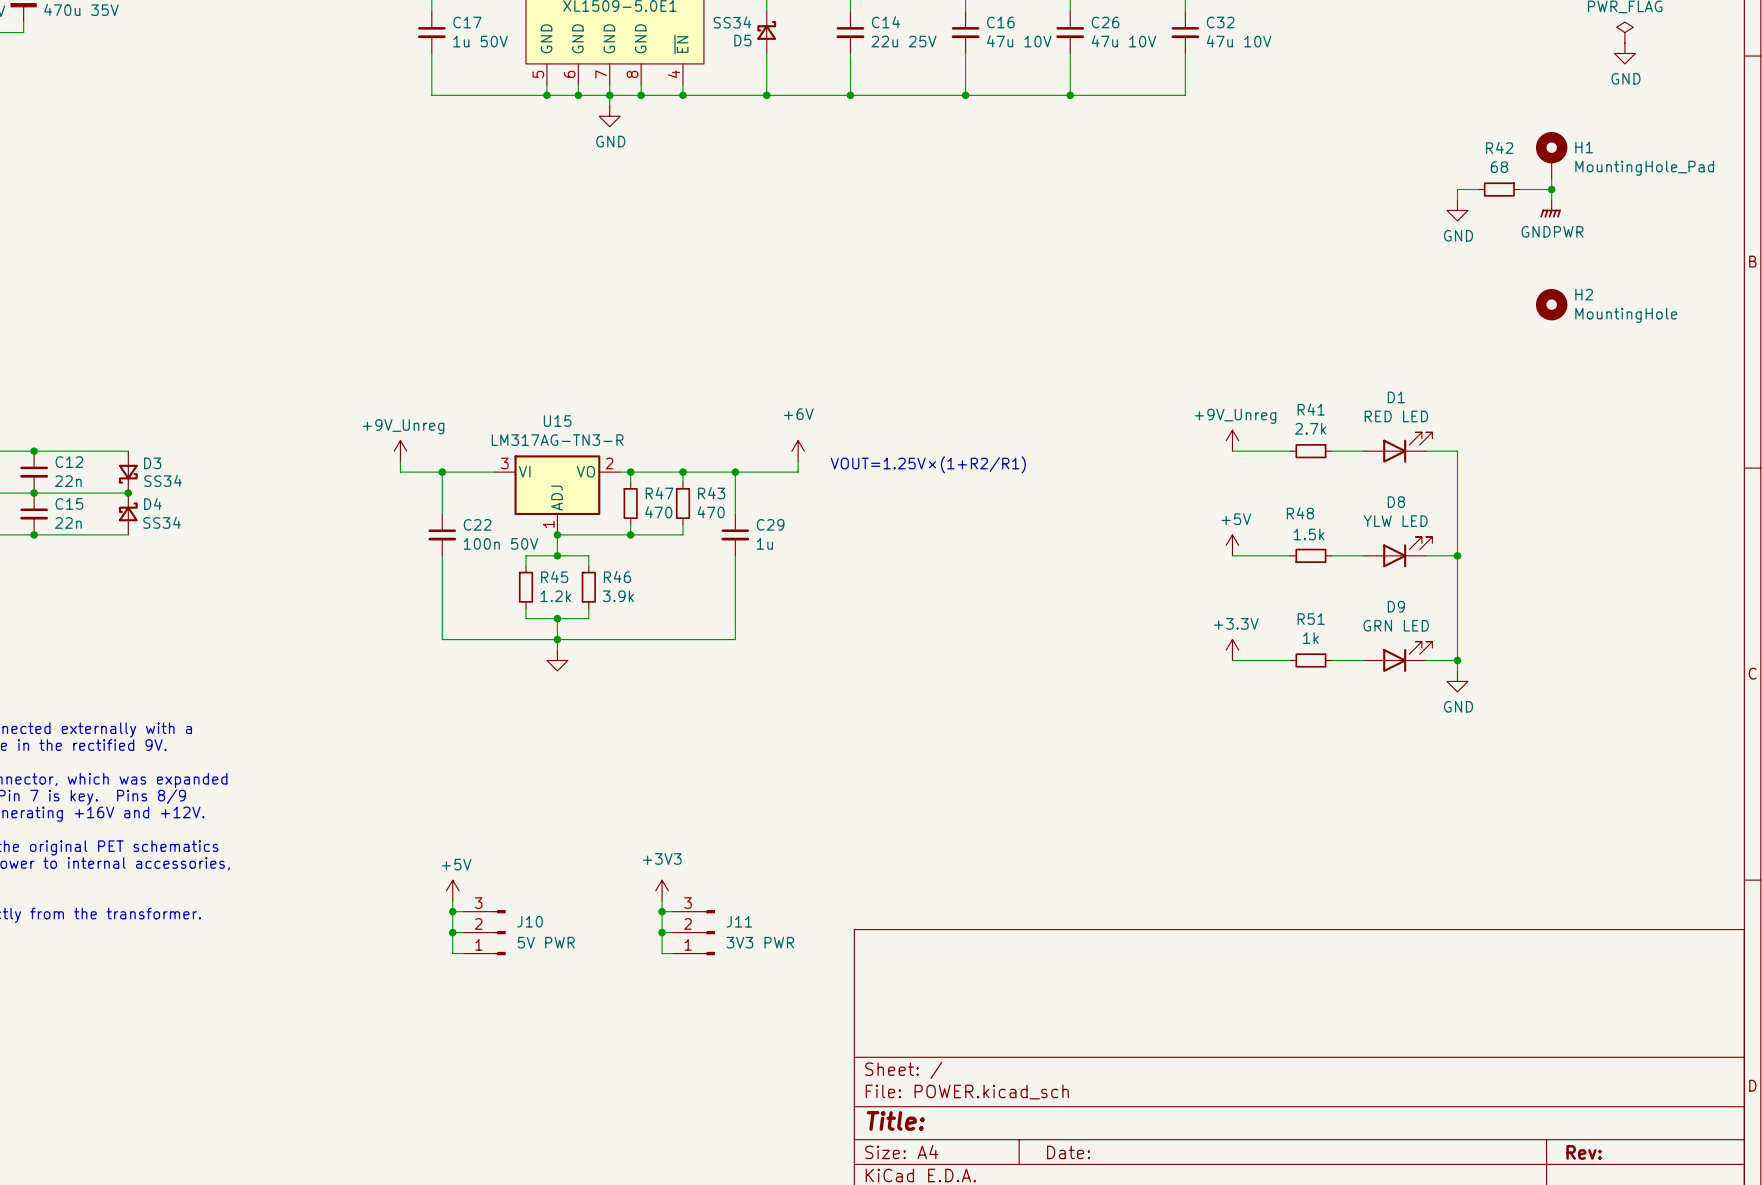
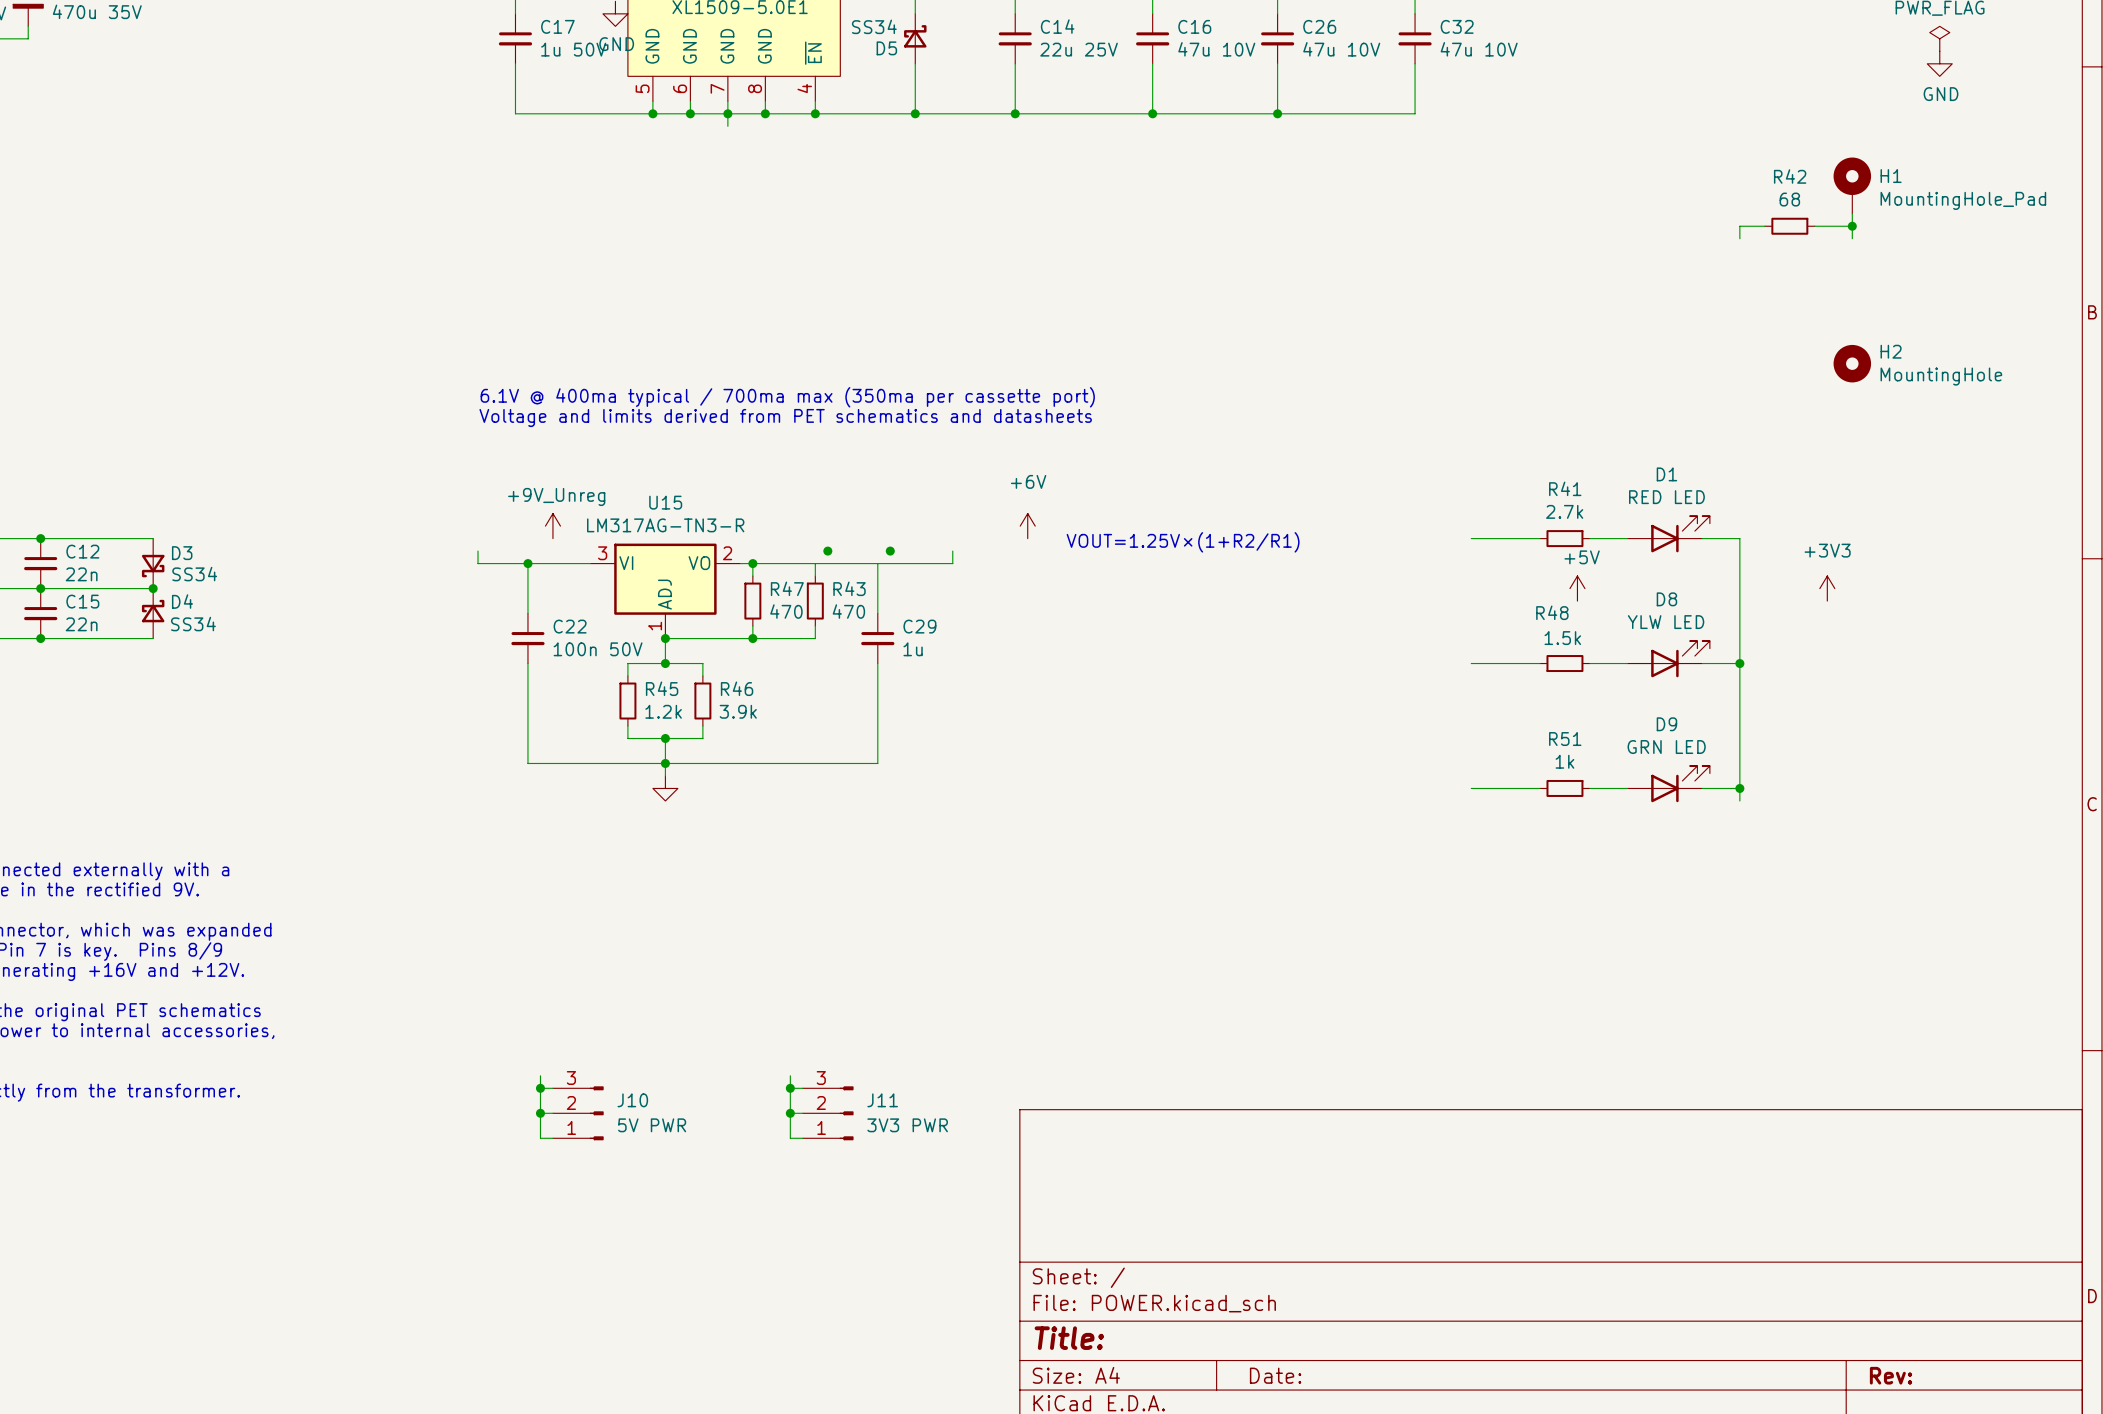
power symbol position: GND (609, 116) -> GND (615, 13)
power symbol: GNDPWR (1550, 208) -> none
power symbol: GND (1457, 210) -> none
text: none -> 6.1V @ 400ma typical / 700ma max (350ma per cassette port) (787, 397)
text: none -> Voltage and limits derived from PET schematics and datasheets (785, 417)
power symbol: +9V_Unreg (1232, 440) -> none
power symbol position: +9V_Unreg (400, 451) -> +9V_Unreg (552, 526)
power symbol position: +6V (798, 451) -> +6V (1027, 526)
text position: VOUT=1.25V×(1+R2/R1) (928, 464) -> VOUT=1.25V×(1+R2/R1) (1183, 542)
junction position: (683, 472) -> (827, 551)
junction position: (735, 472) -> (890, 551)
power symbol: none -> +3V3 (1827, 588)
power symbol position: +5V (1232, 545) -> +5V (1577, 588)
power symbol: +3.3V (1232, 650) -> none
power symbol: GND (1457, 681) -> none
power symbol: +5V (452, 890) -> none
power symbol: +3V3 (662, 890) -> none

